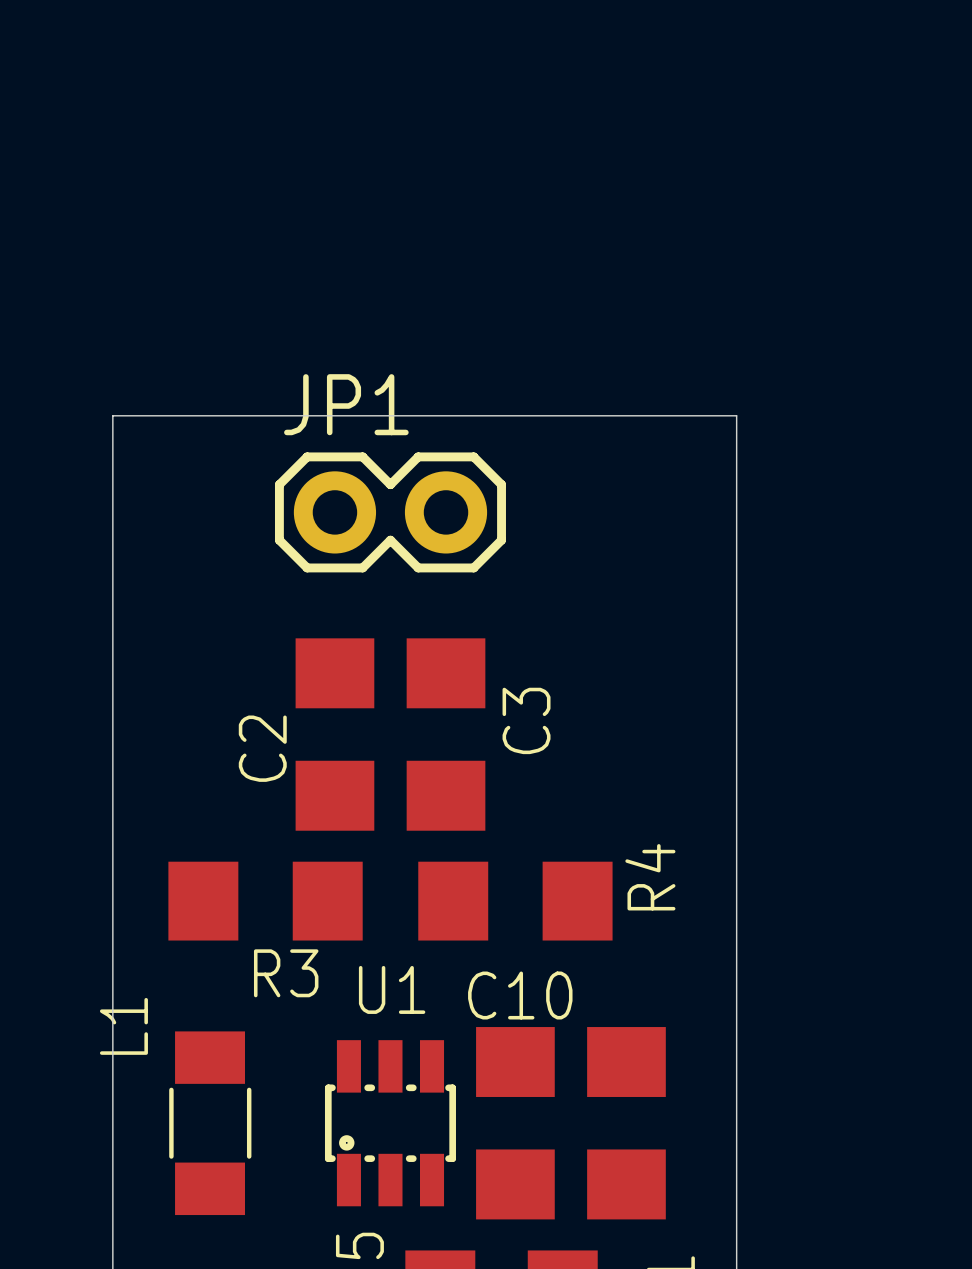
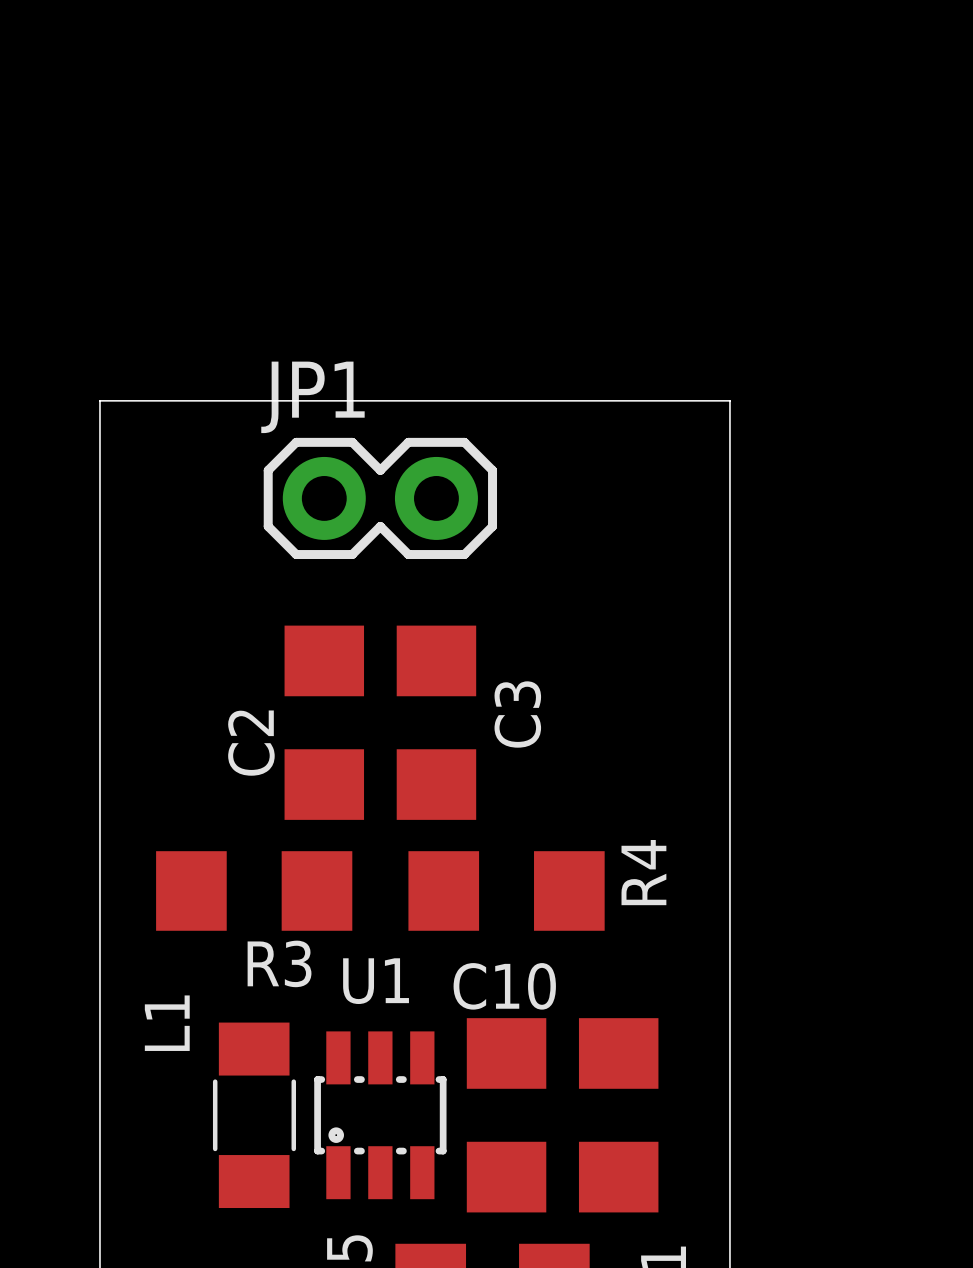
L1 position: (210, 1123) -> (254, 1115)

